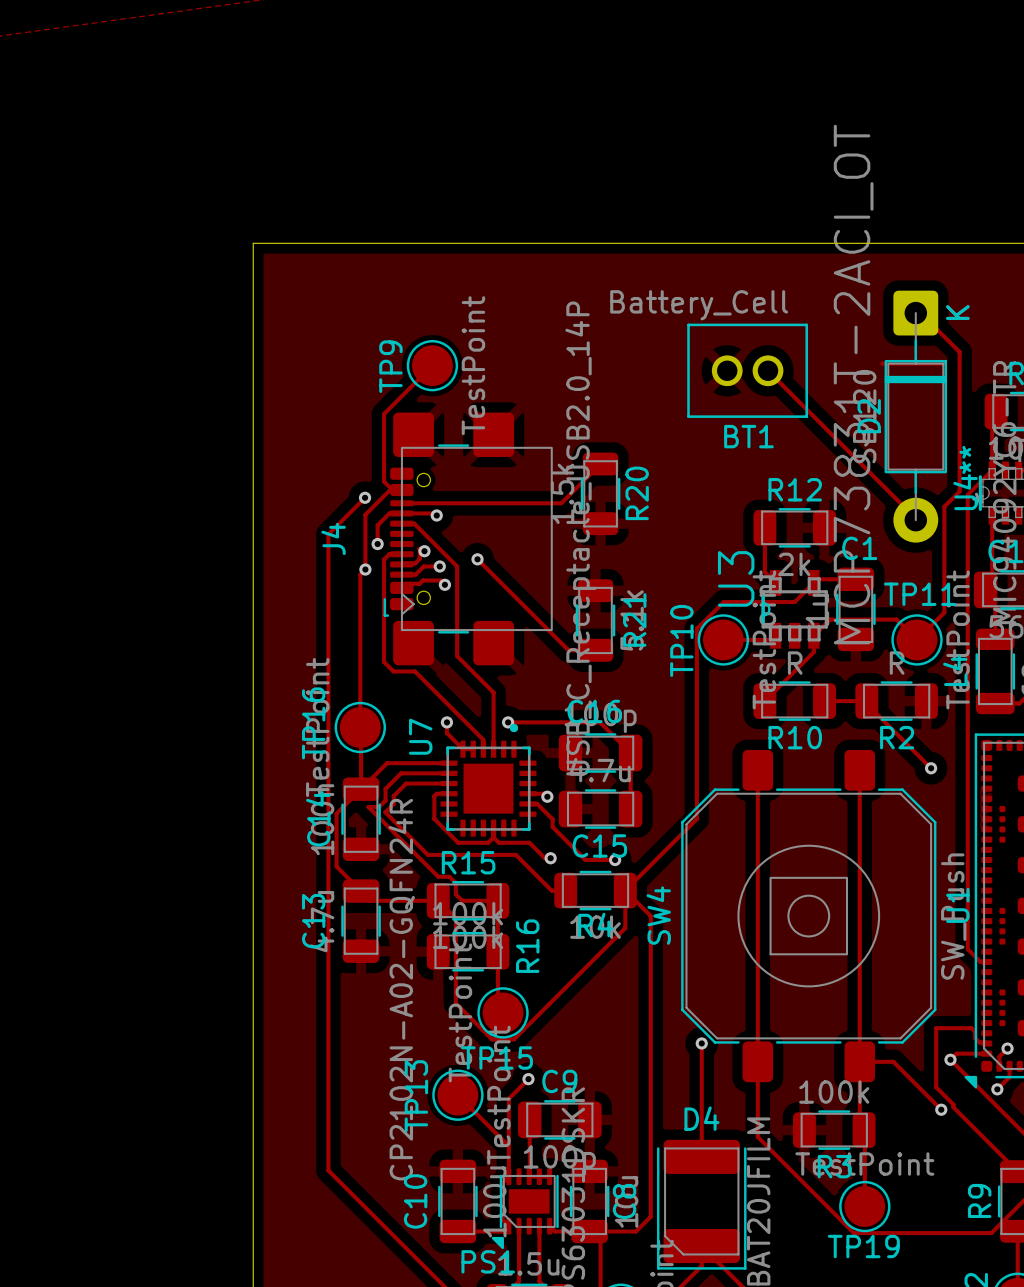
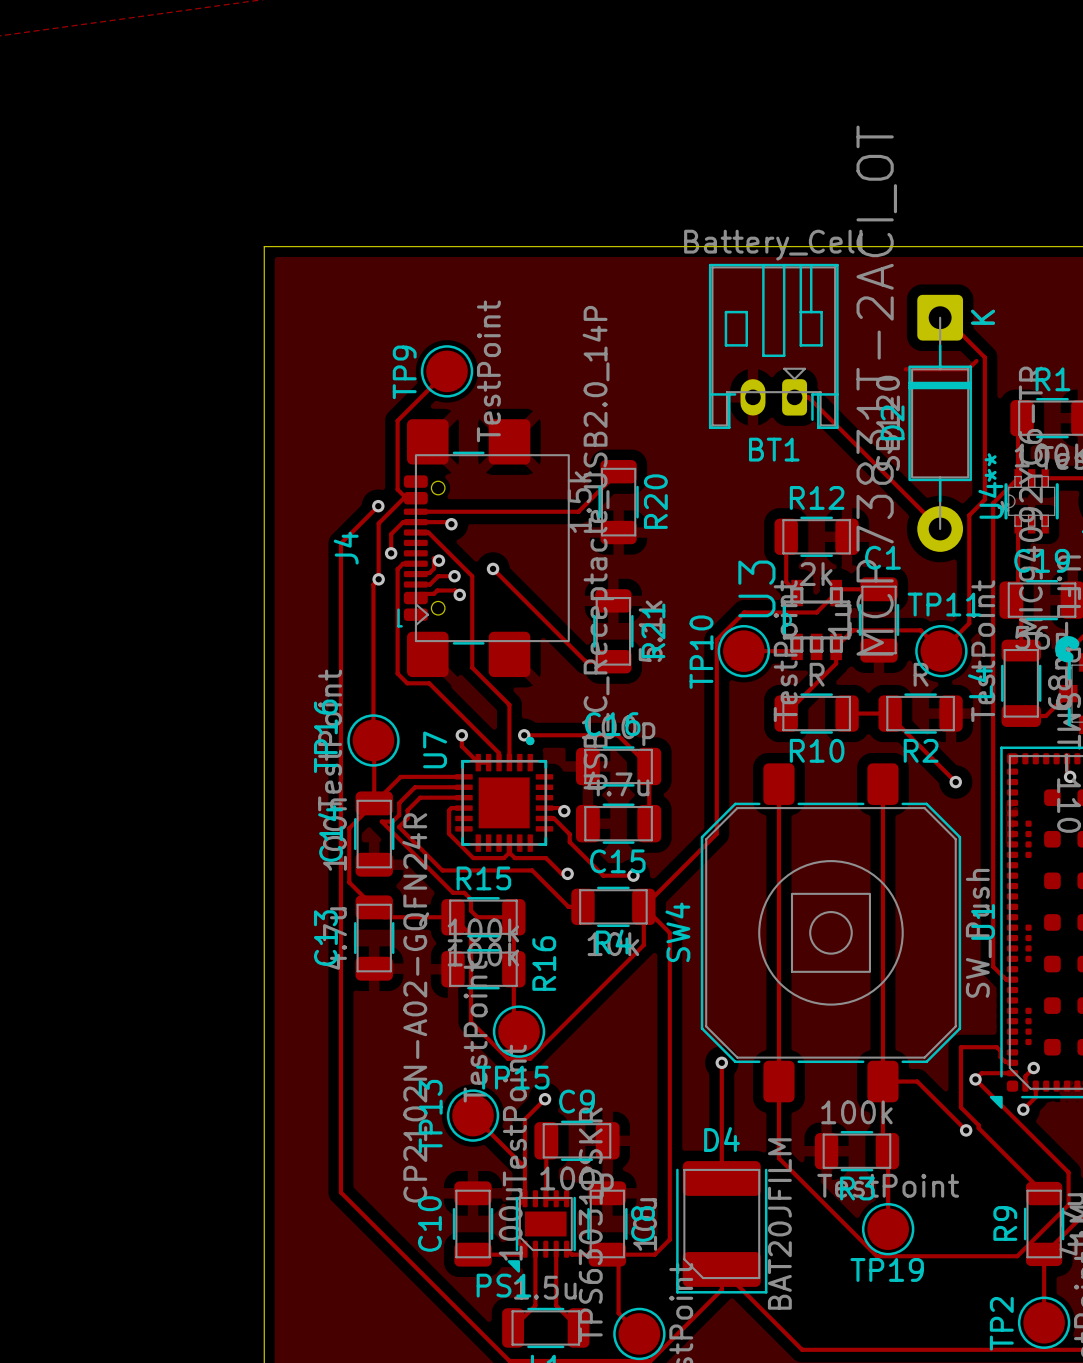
BT1 value position: Battery_Cell (699, 305) -> Battery_Cell (774, 245)
BT1 footprint: [687, 323, 809, 418] -> [708, 263, 839, 429]
track: none -> (976, 360) (968, 369)
track: (768, 370) (915, 518) -> none
track: none -> (794, 397) (808, 397) (940, 528)

